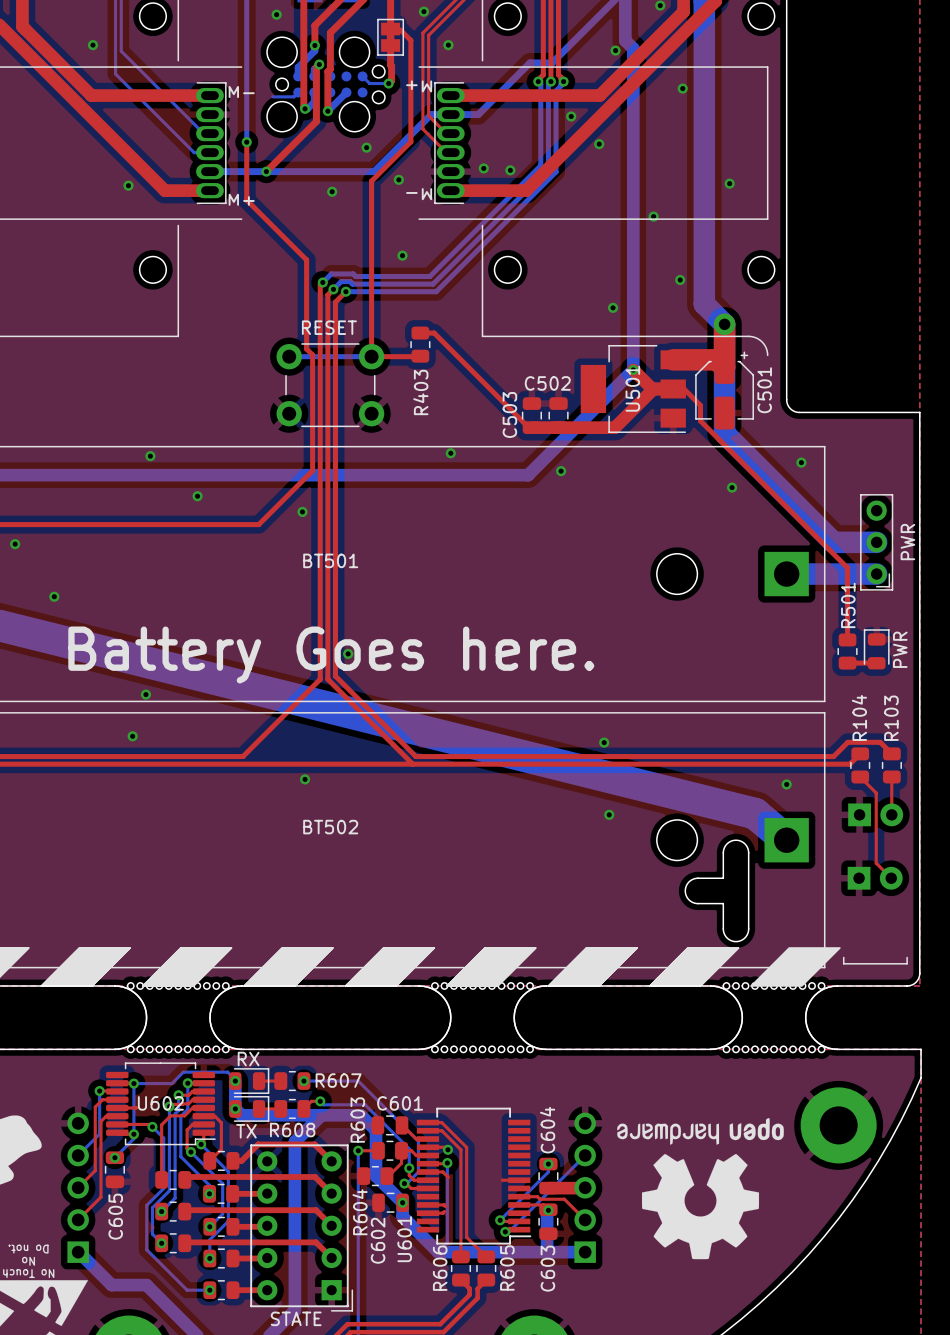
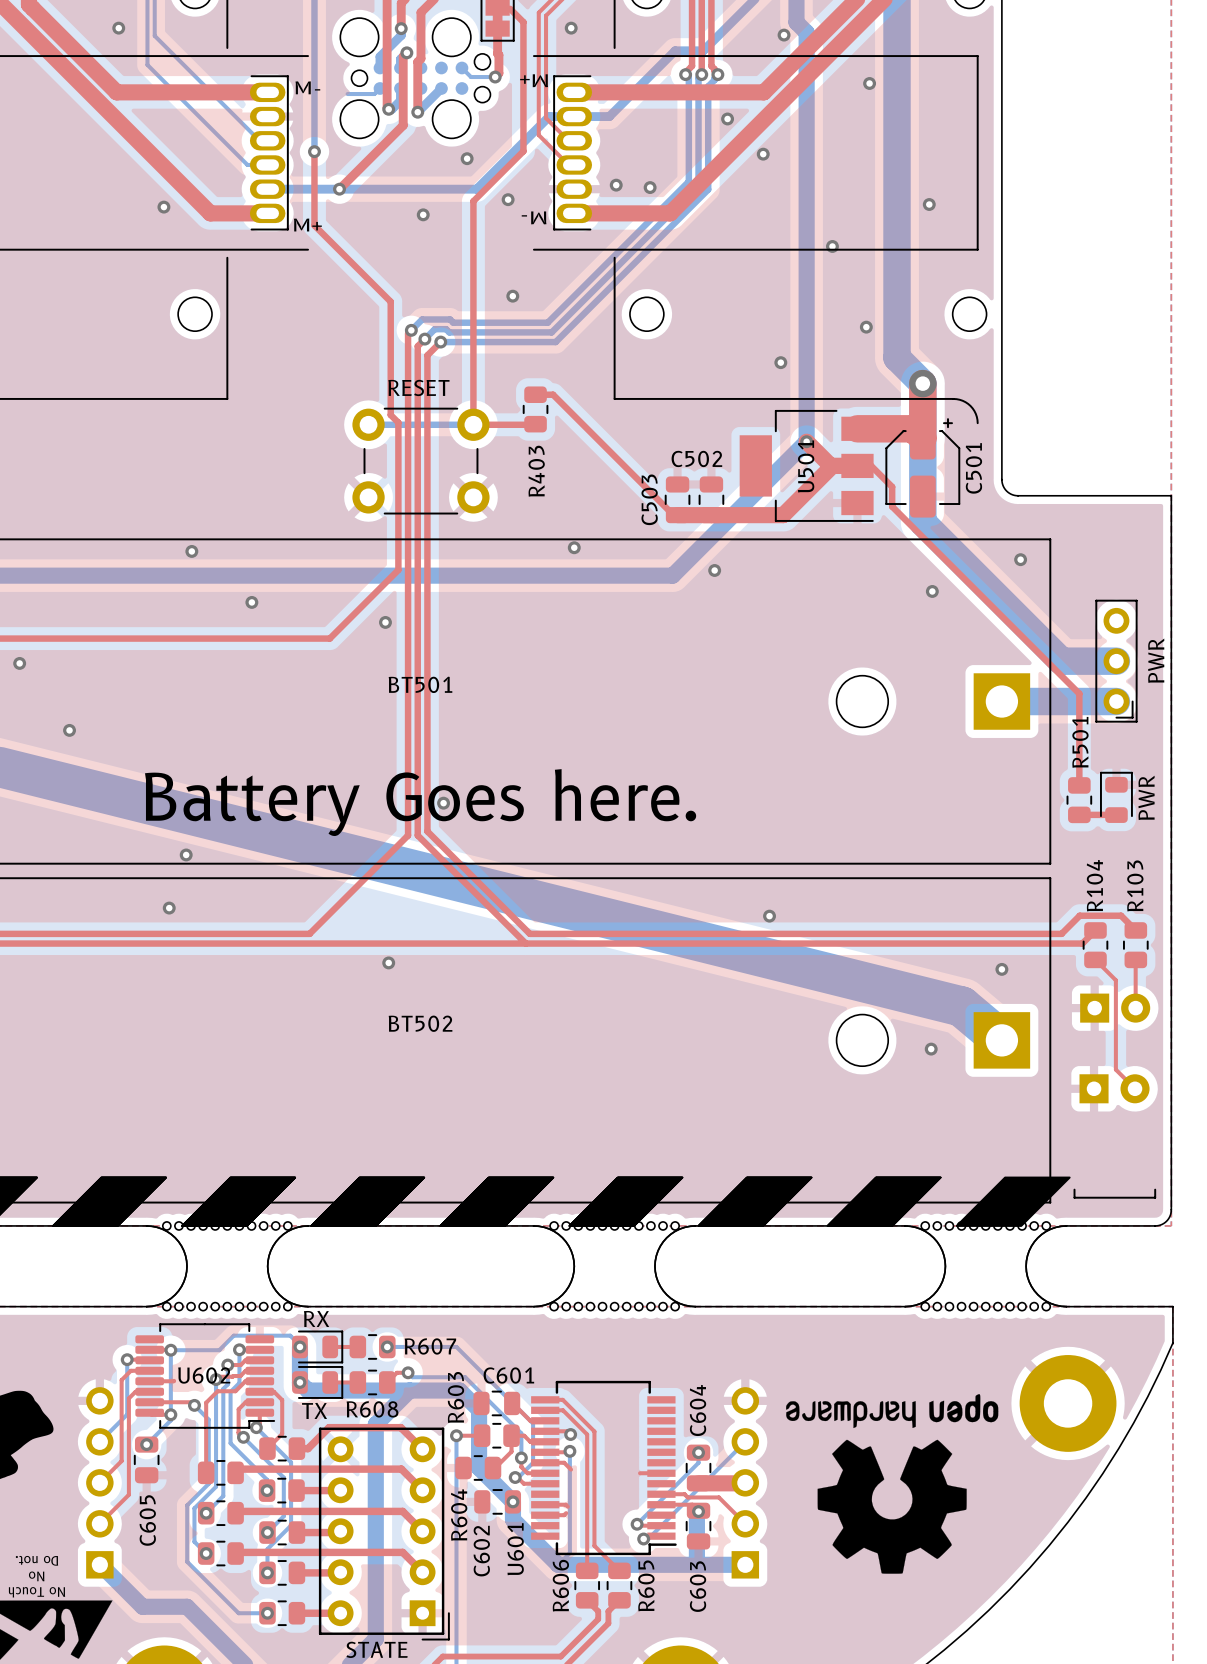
via: (609, 814) -> none
via: none -> (931, 1049)
board edge: (723, 852) (723, 878) (693, 879) (686, 884) (685, 892) (687, 898) (694, 903) (723, 903) (724, 933) (729, 939) (737, 941) (744, 937) (748, 930) (748, 851) (743, 842) (735, 840) (727, 843) (723, 852) -> none

